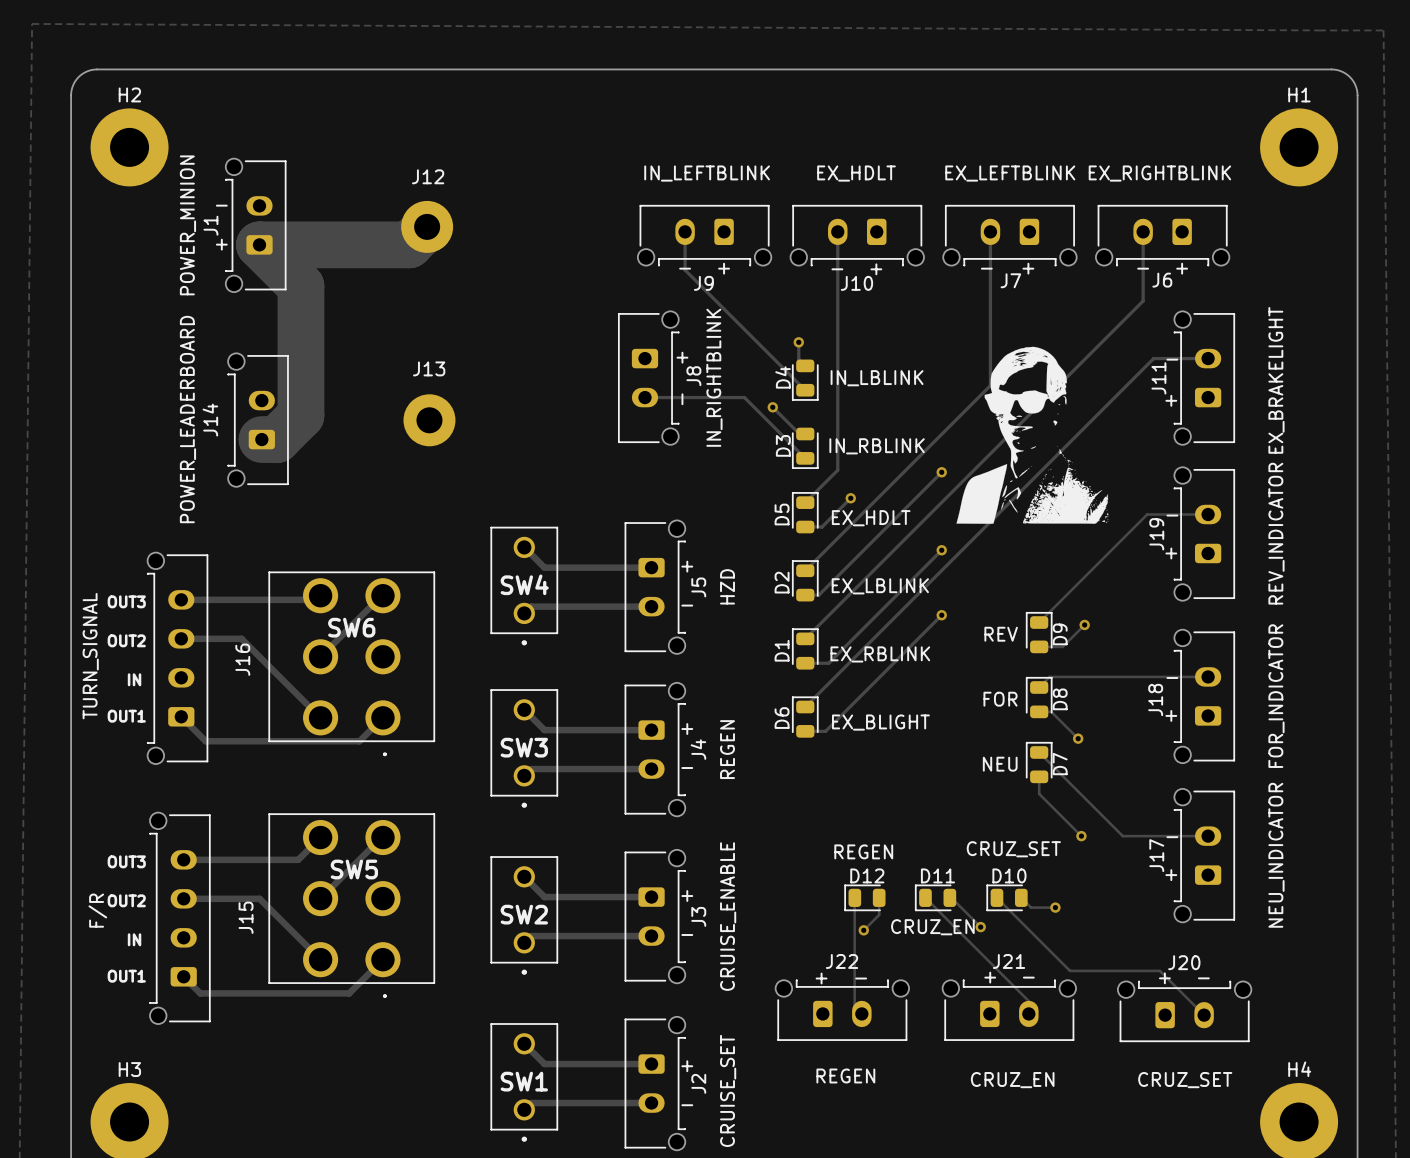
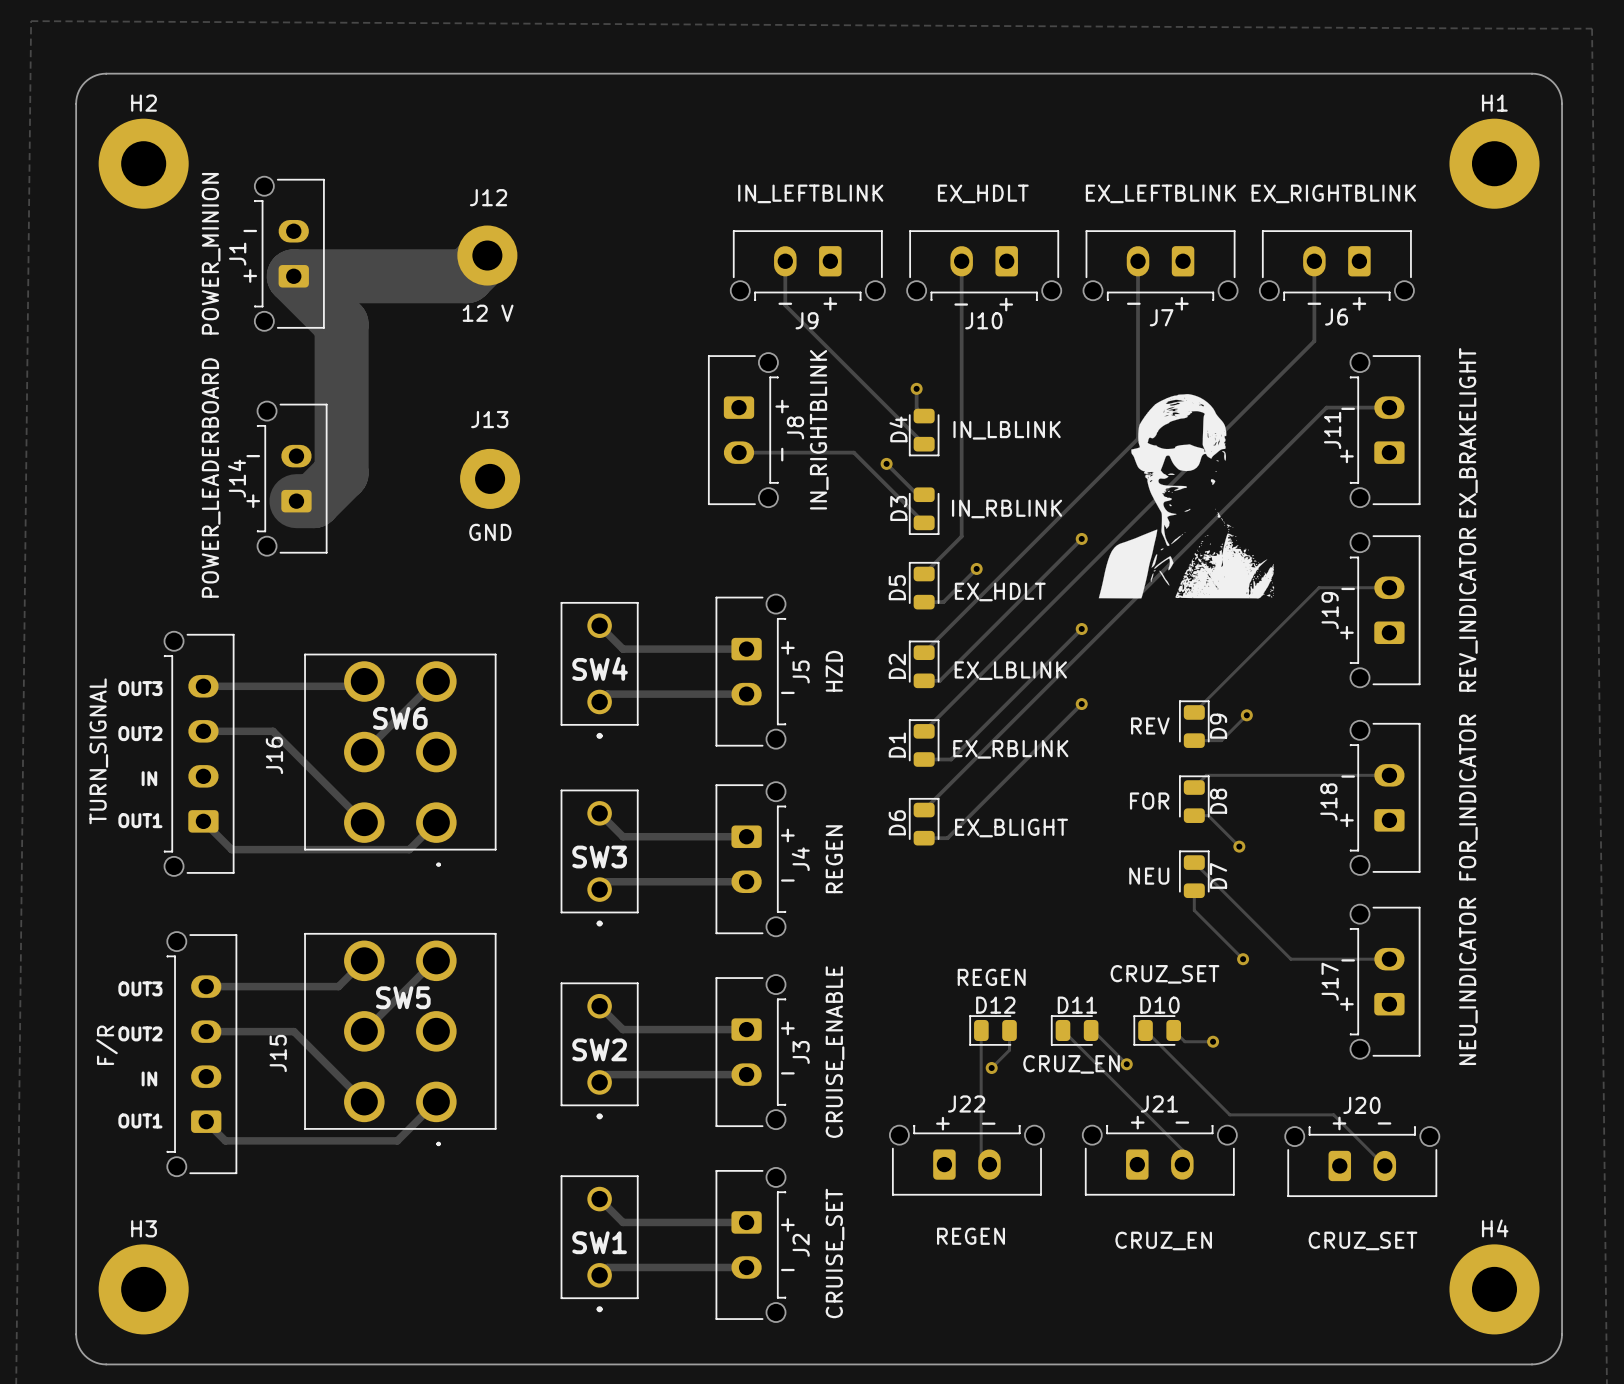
text: none -> 12 V (488, 313)
text: none -> - (253, 456)
text: none -> + (253, 501)
J13 value: none -> GND (490, 532)

